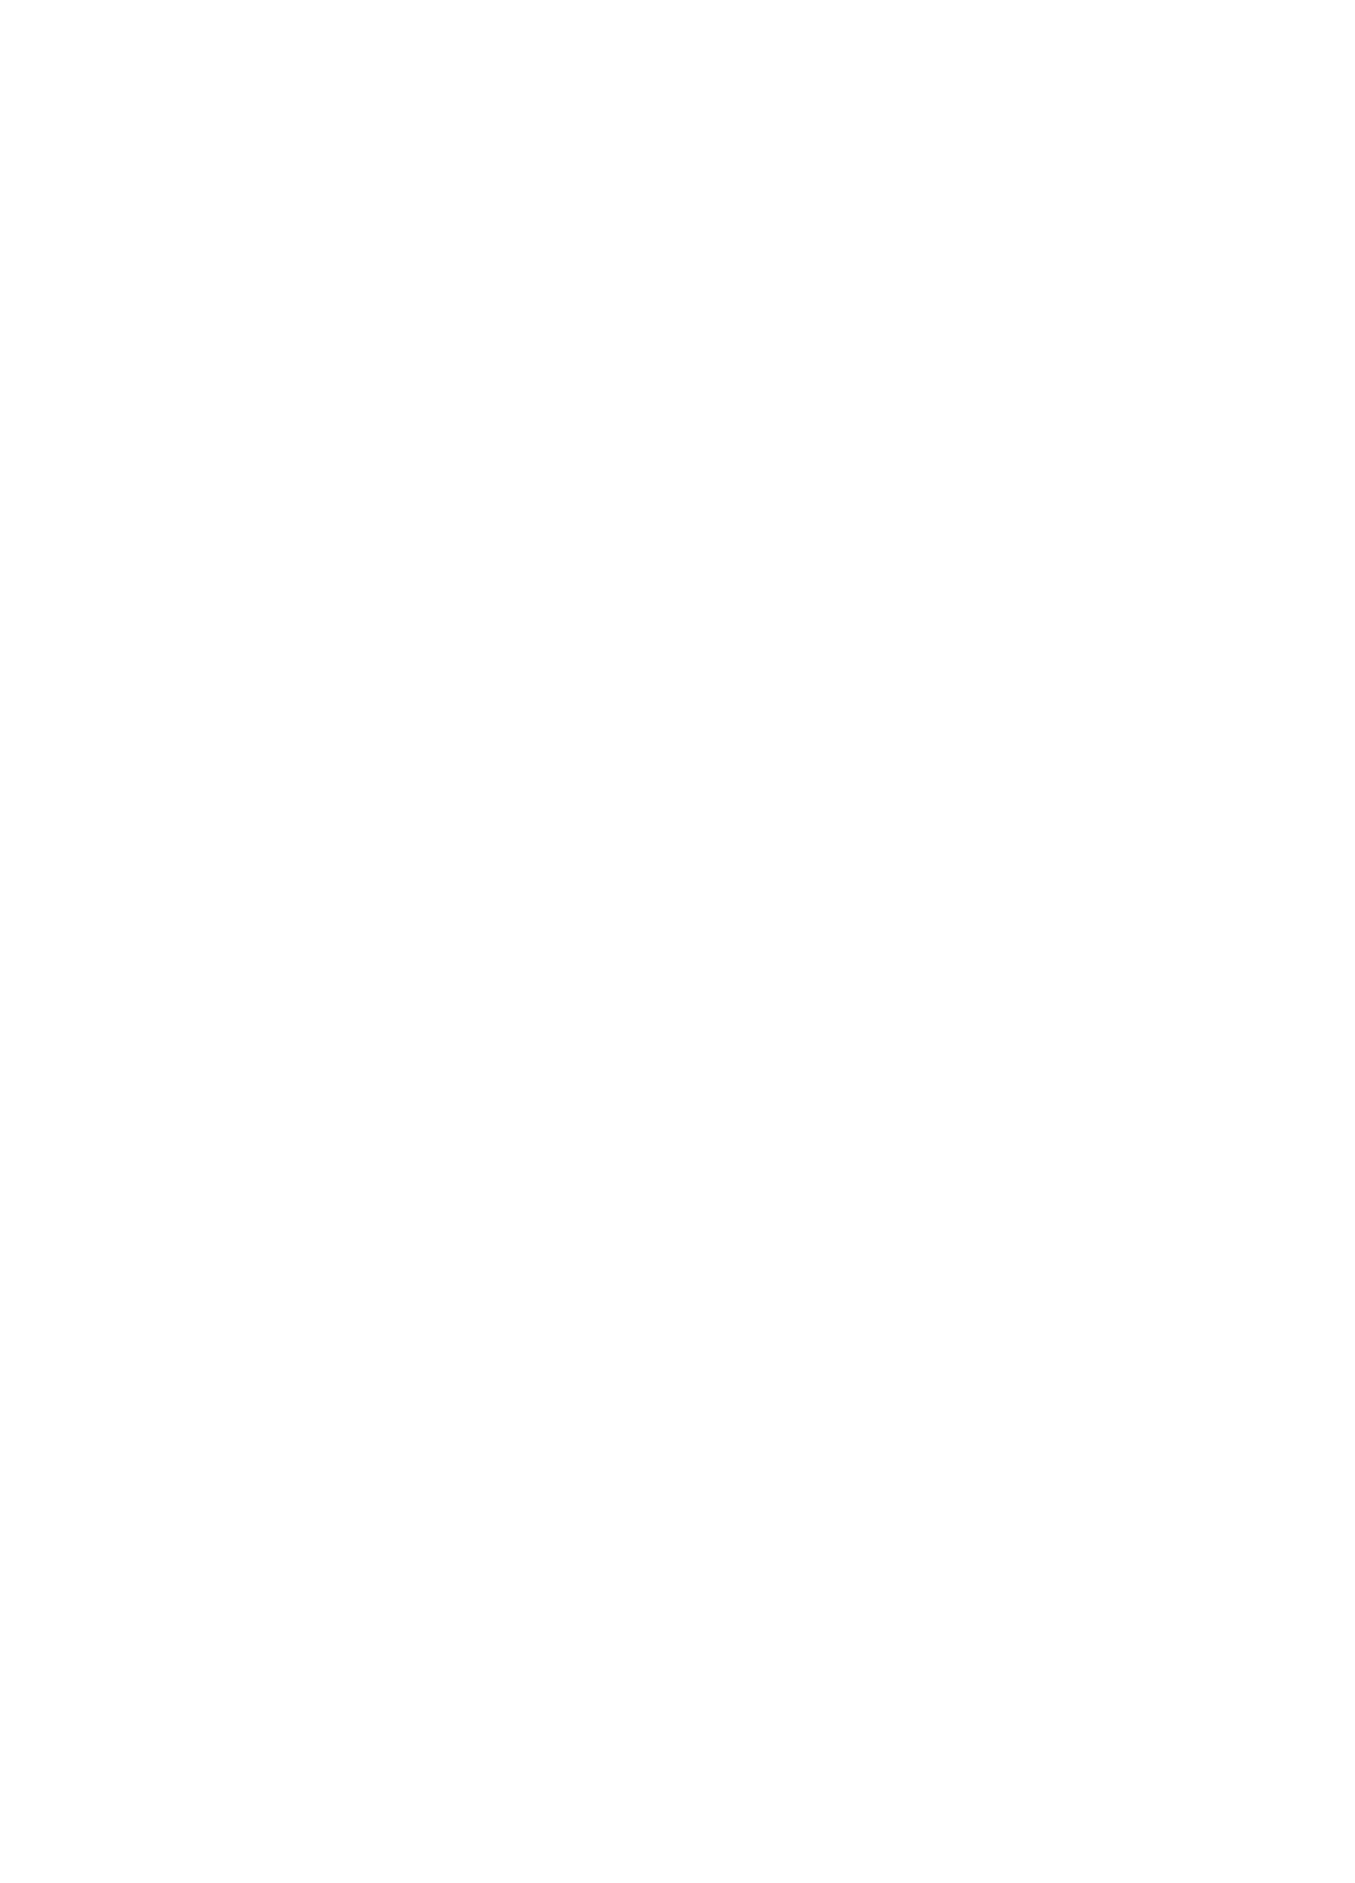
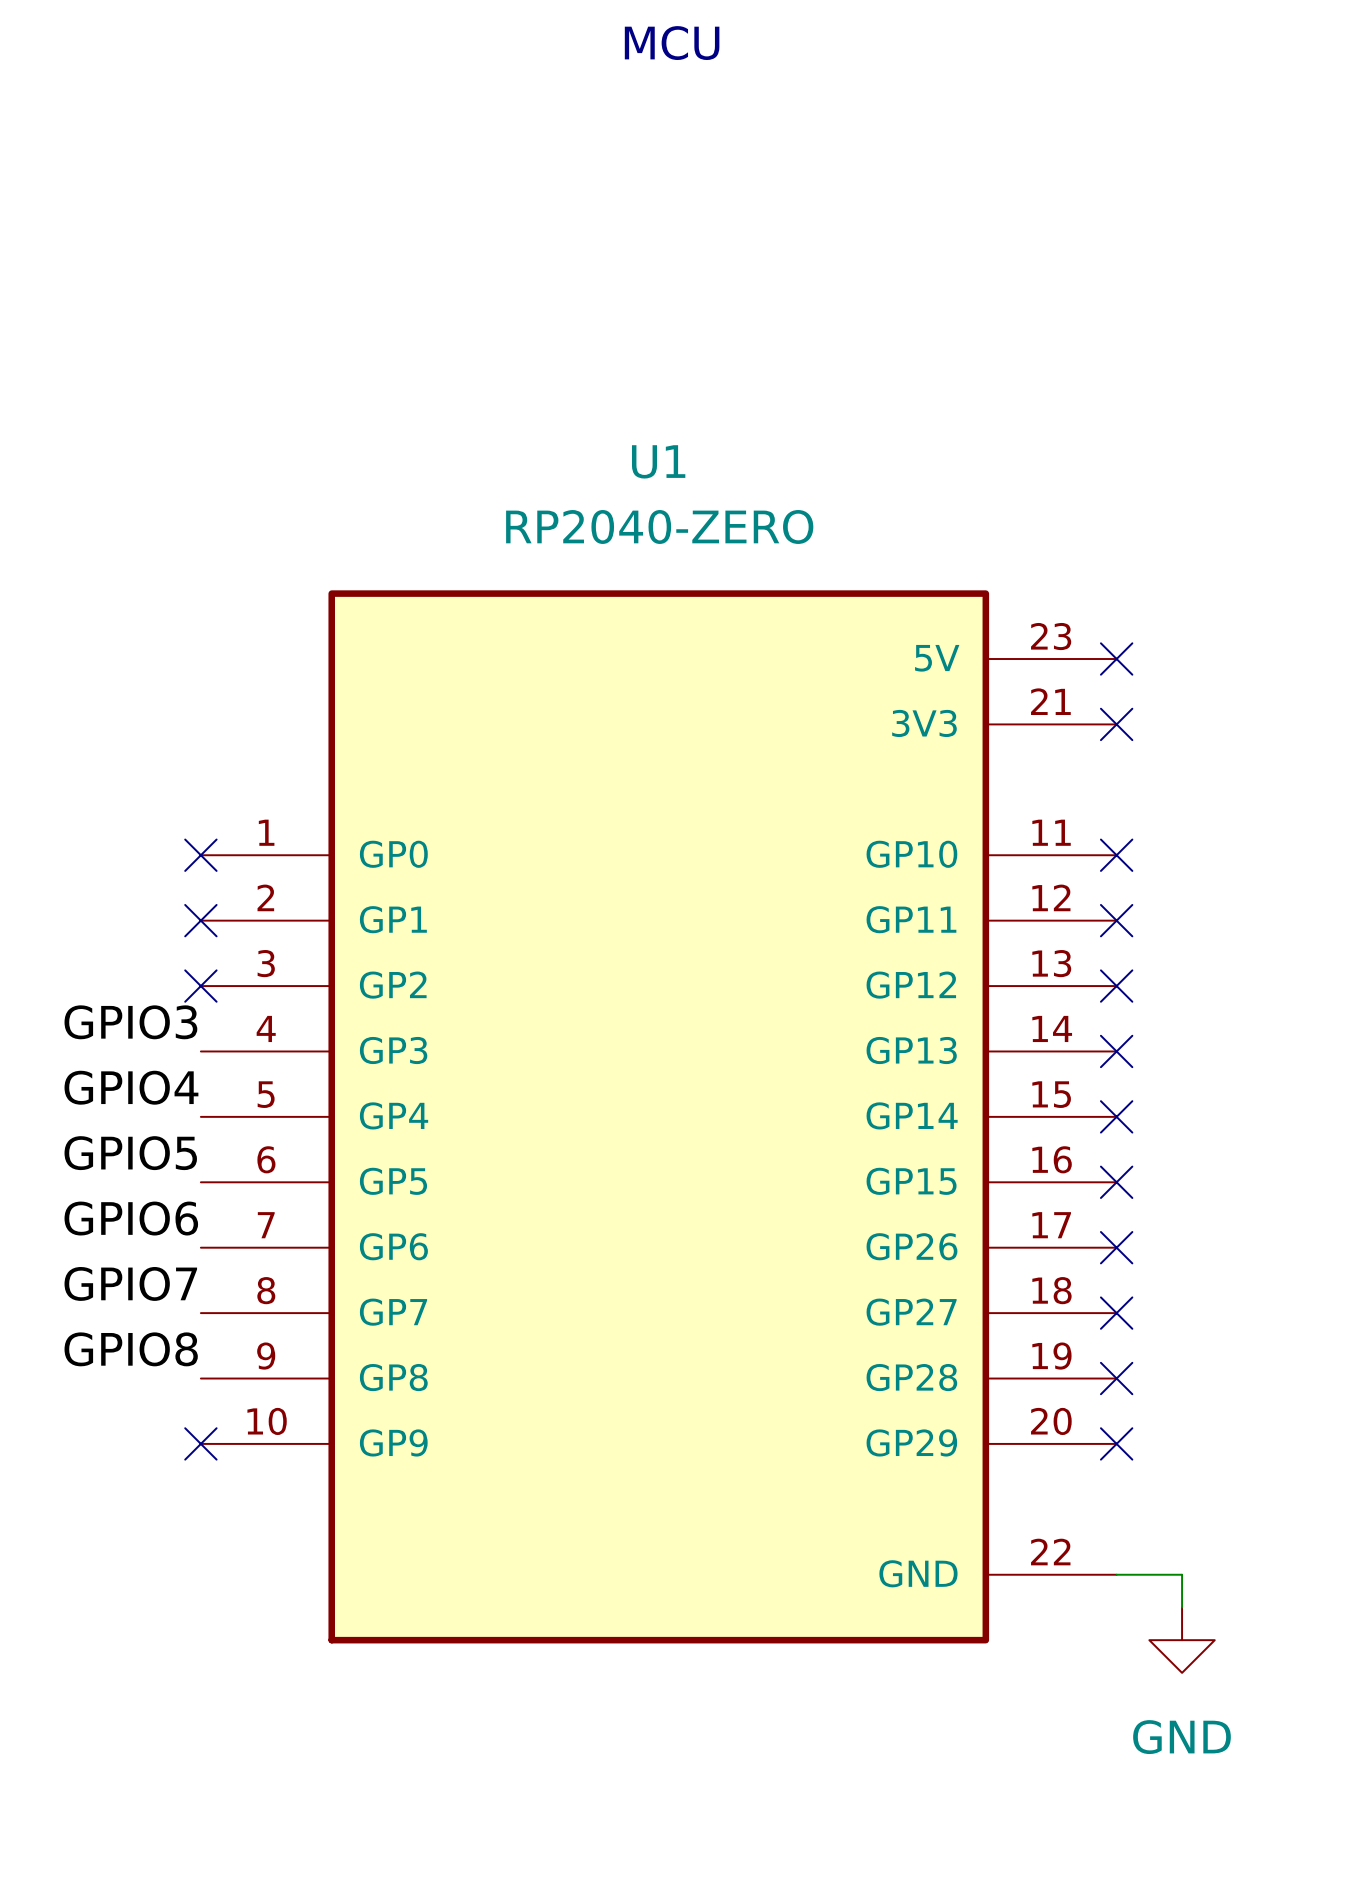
text: none -> MCU (672, 43)
no-connect mark: none -> (1116, 659)
no-connect mark: none -> (1116, 724)
no-connect mark: none -> (200, 855)
no-connect mark: none -> (1116, 855)
no-connect mark: none -> (200, 920)
no-connect mark: none -> (1116, 920)
no-connect mark: none -> (200, 986)
no-connect mark: none -> (1116, 986)
label: none -> GPIO3 (130, 1022)
no-connect mark: none -> (1116, 1051)
label: none -> GPIO4 (131, 1087)
U1: none -> RP2040-ZERO (658, 1116)
no-connect mark: none -> (1116, 1116)
label: none -> GPIO5 (130, 1153)
no-connect mark: none -> (1116, 1182)
label: none -> GPIO6 (131, 1218)
no-connect mark: none -> (1116, 1247)
label: none -> GPIO7 (130, 1283)
no-connect mark: none -> (1116, 1313)
label: none -> GPIO8 (131, 1349)
no-connect mark: none -> (1116, 1378)
no-connect mark: none -> (200, 1443)
no-connect mark: none -> (1116, 1443)
wire: none -> (1116, 1574) (1182, 1574) (1182, 1607)
power symbol: none -> GND (1182, 1640)

